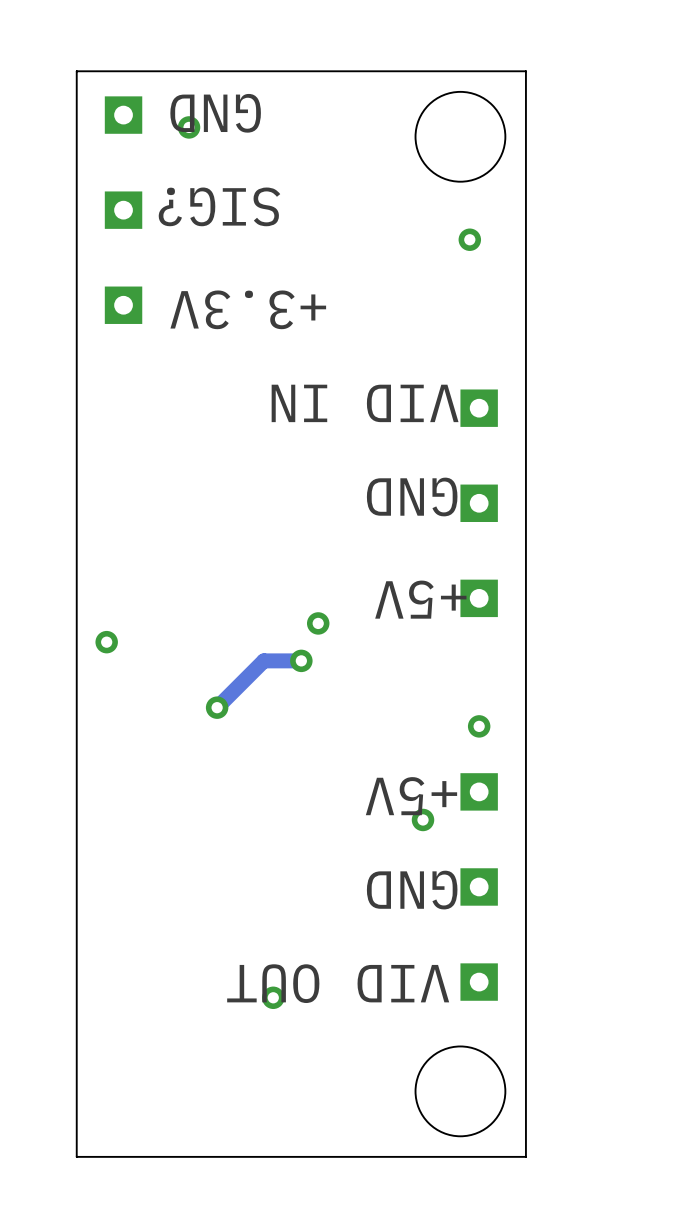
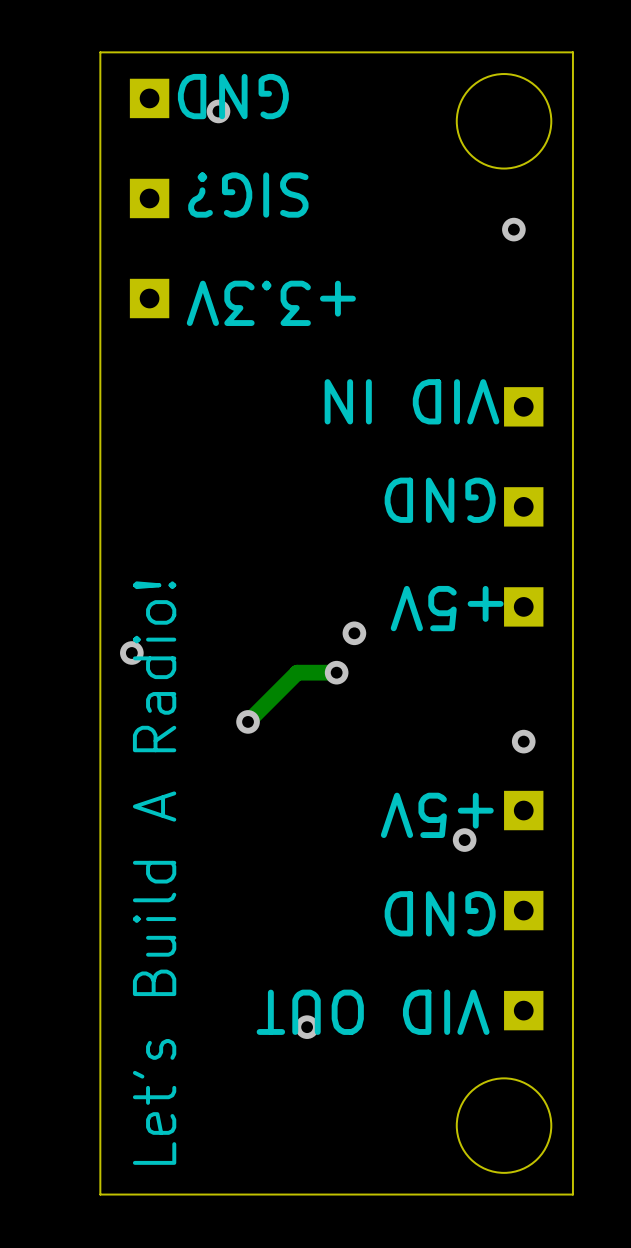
text: none -> Let's Build A Radio! (154, 873)

